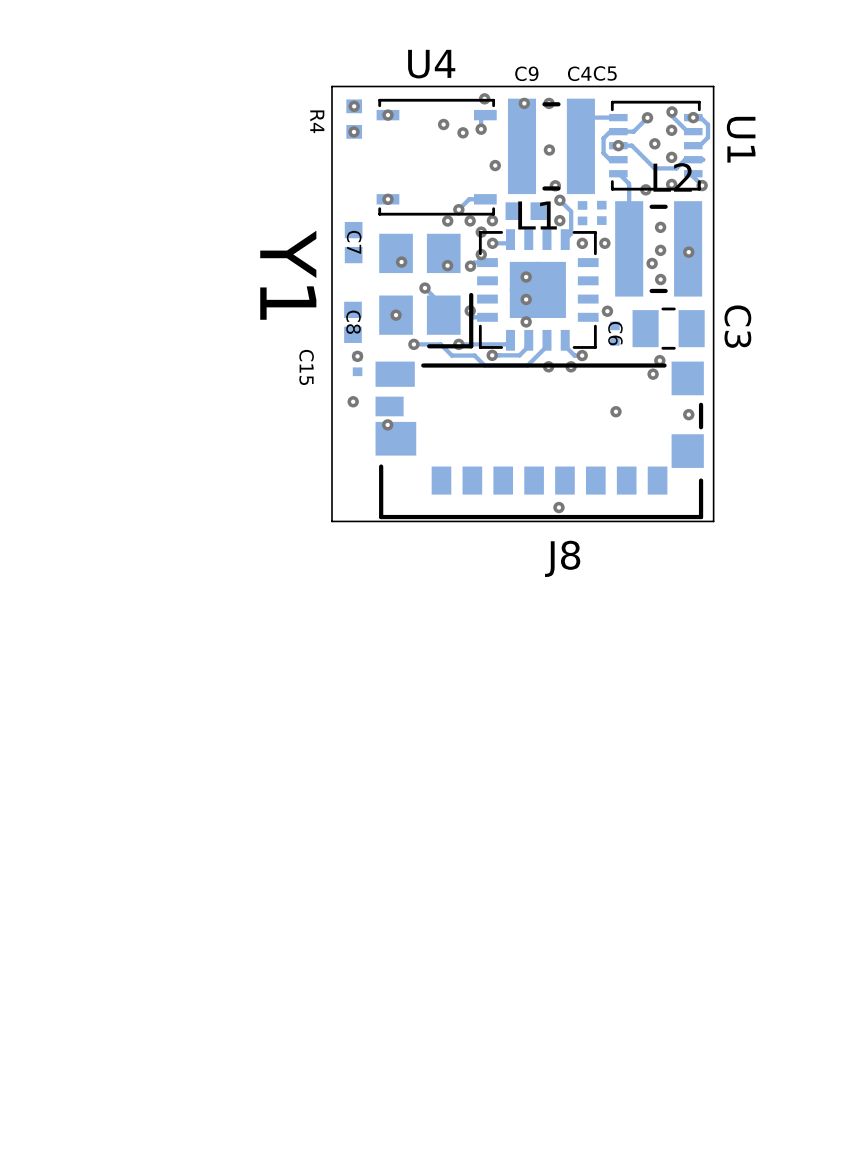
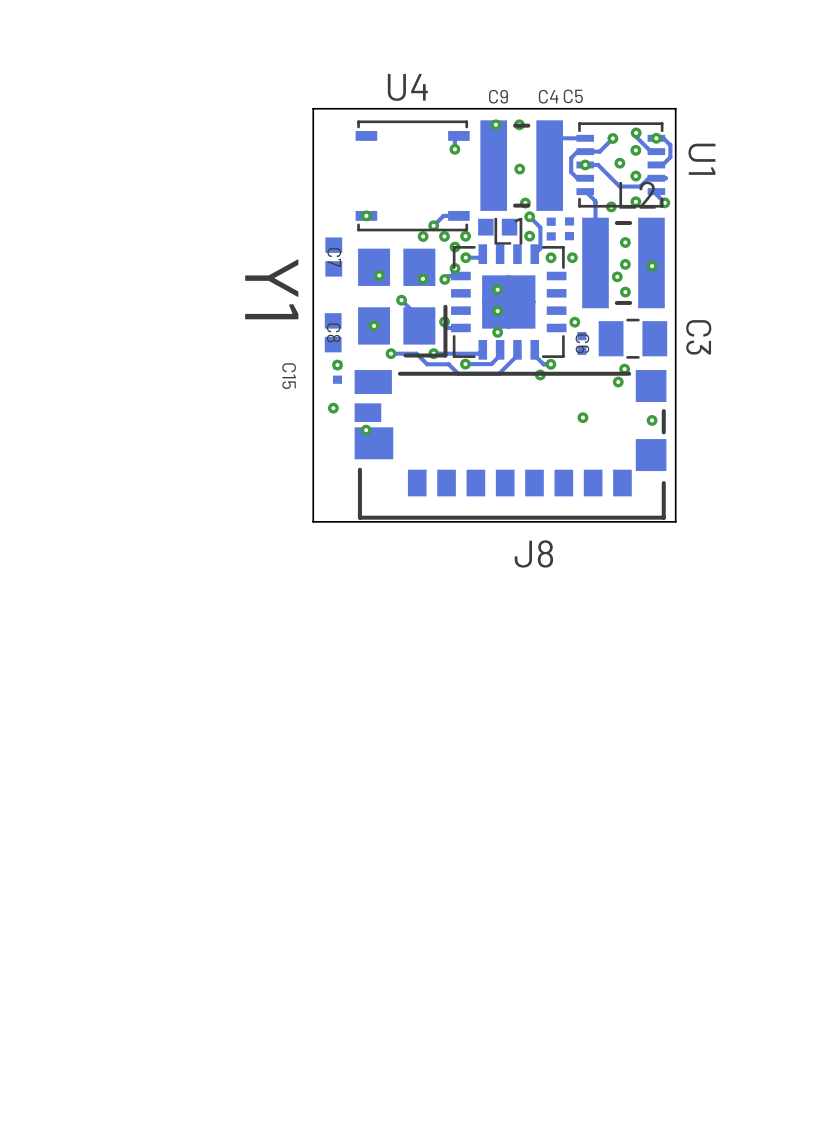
via: (484, 98) -> none
via: (354, 106) -> none
via: (387, 115) -> none
R4: (354, 119) -> none
via: (443, 124) -> none
via: (353, 131) -> none
via: (463, 132) -> none
via: (495, 165) -> none
via: (548, 366) -> none
via: (558, 507) -> none

